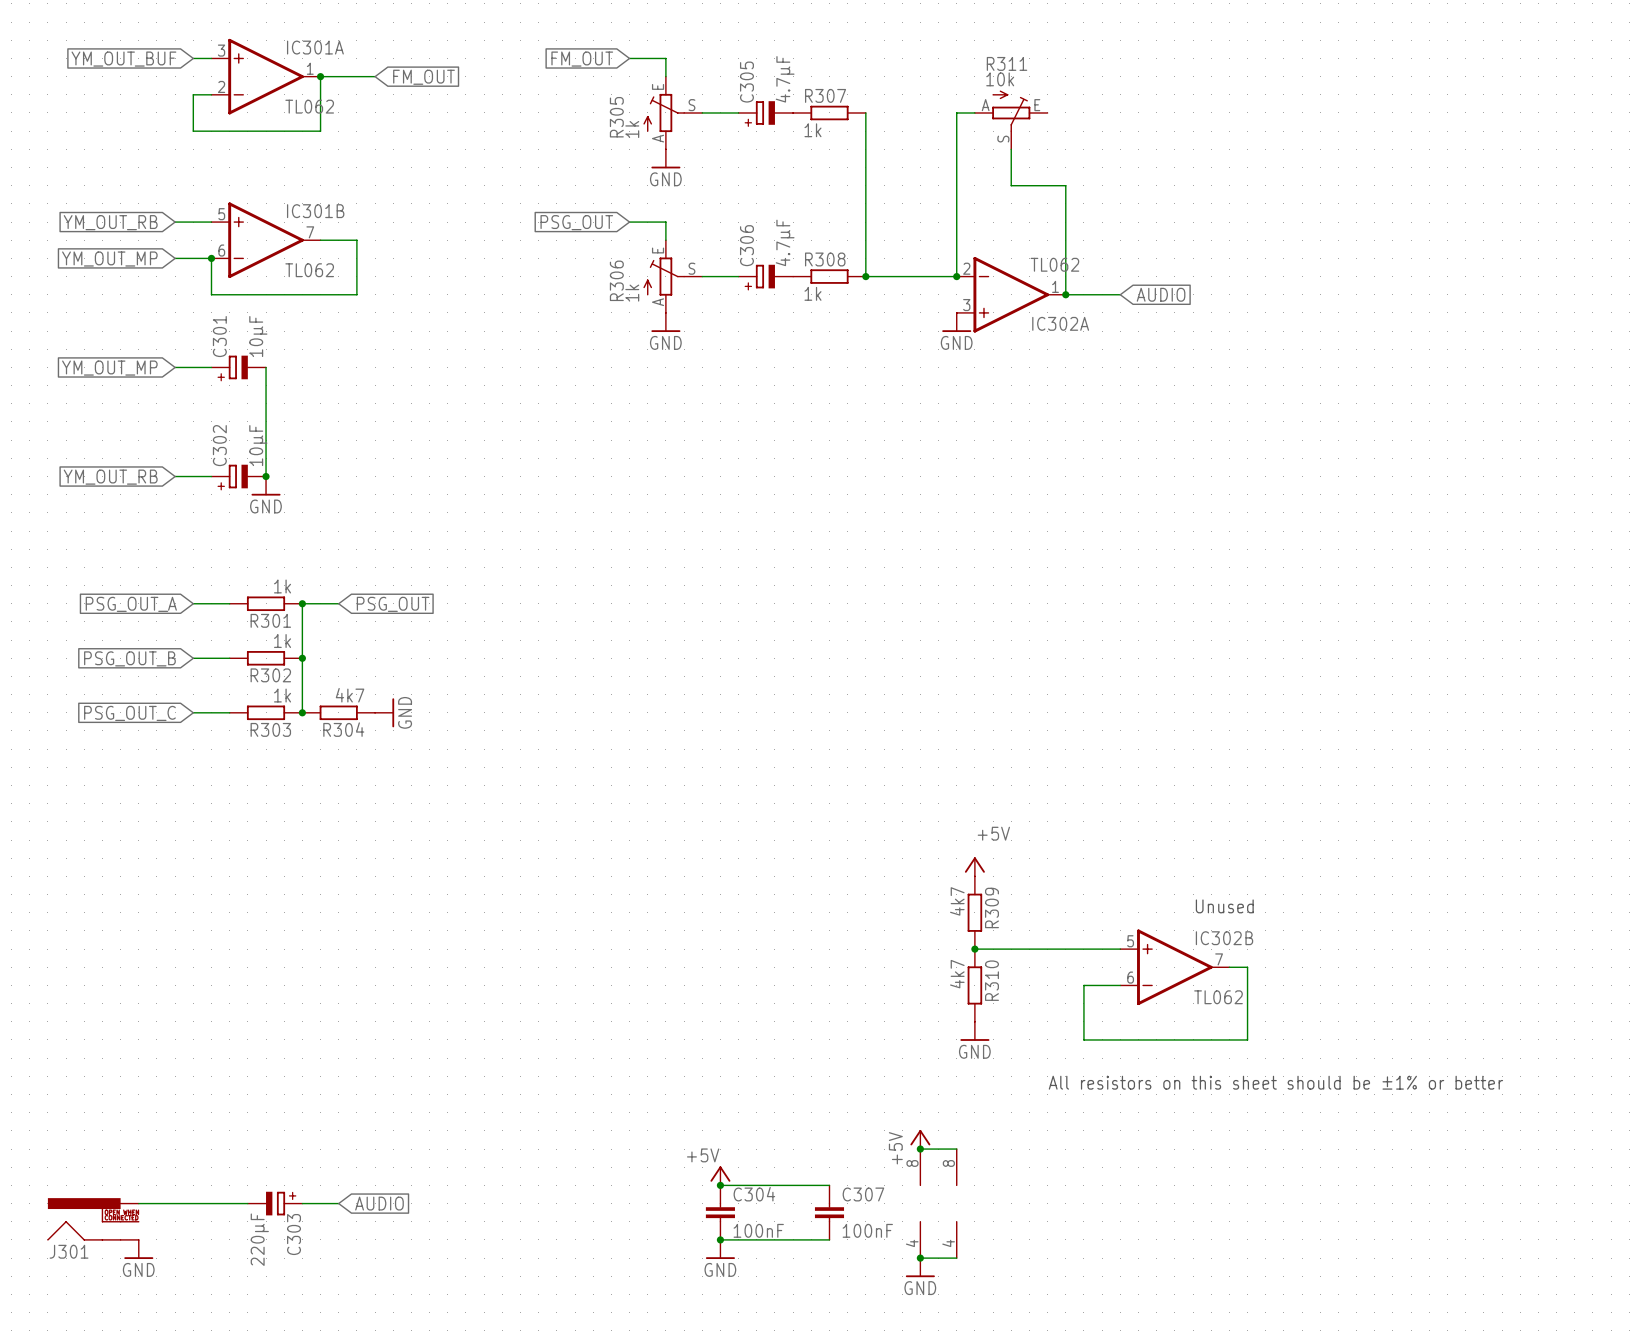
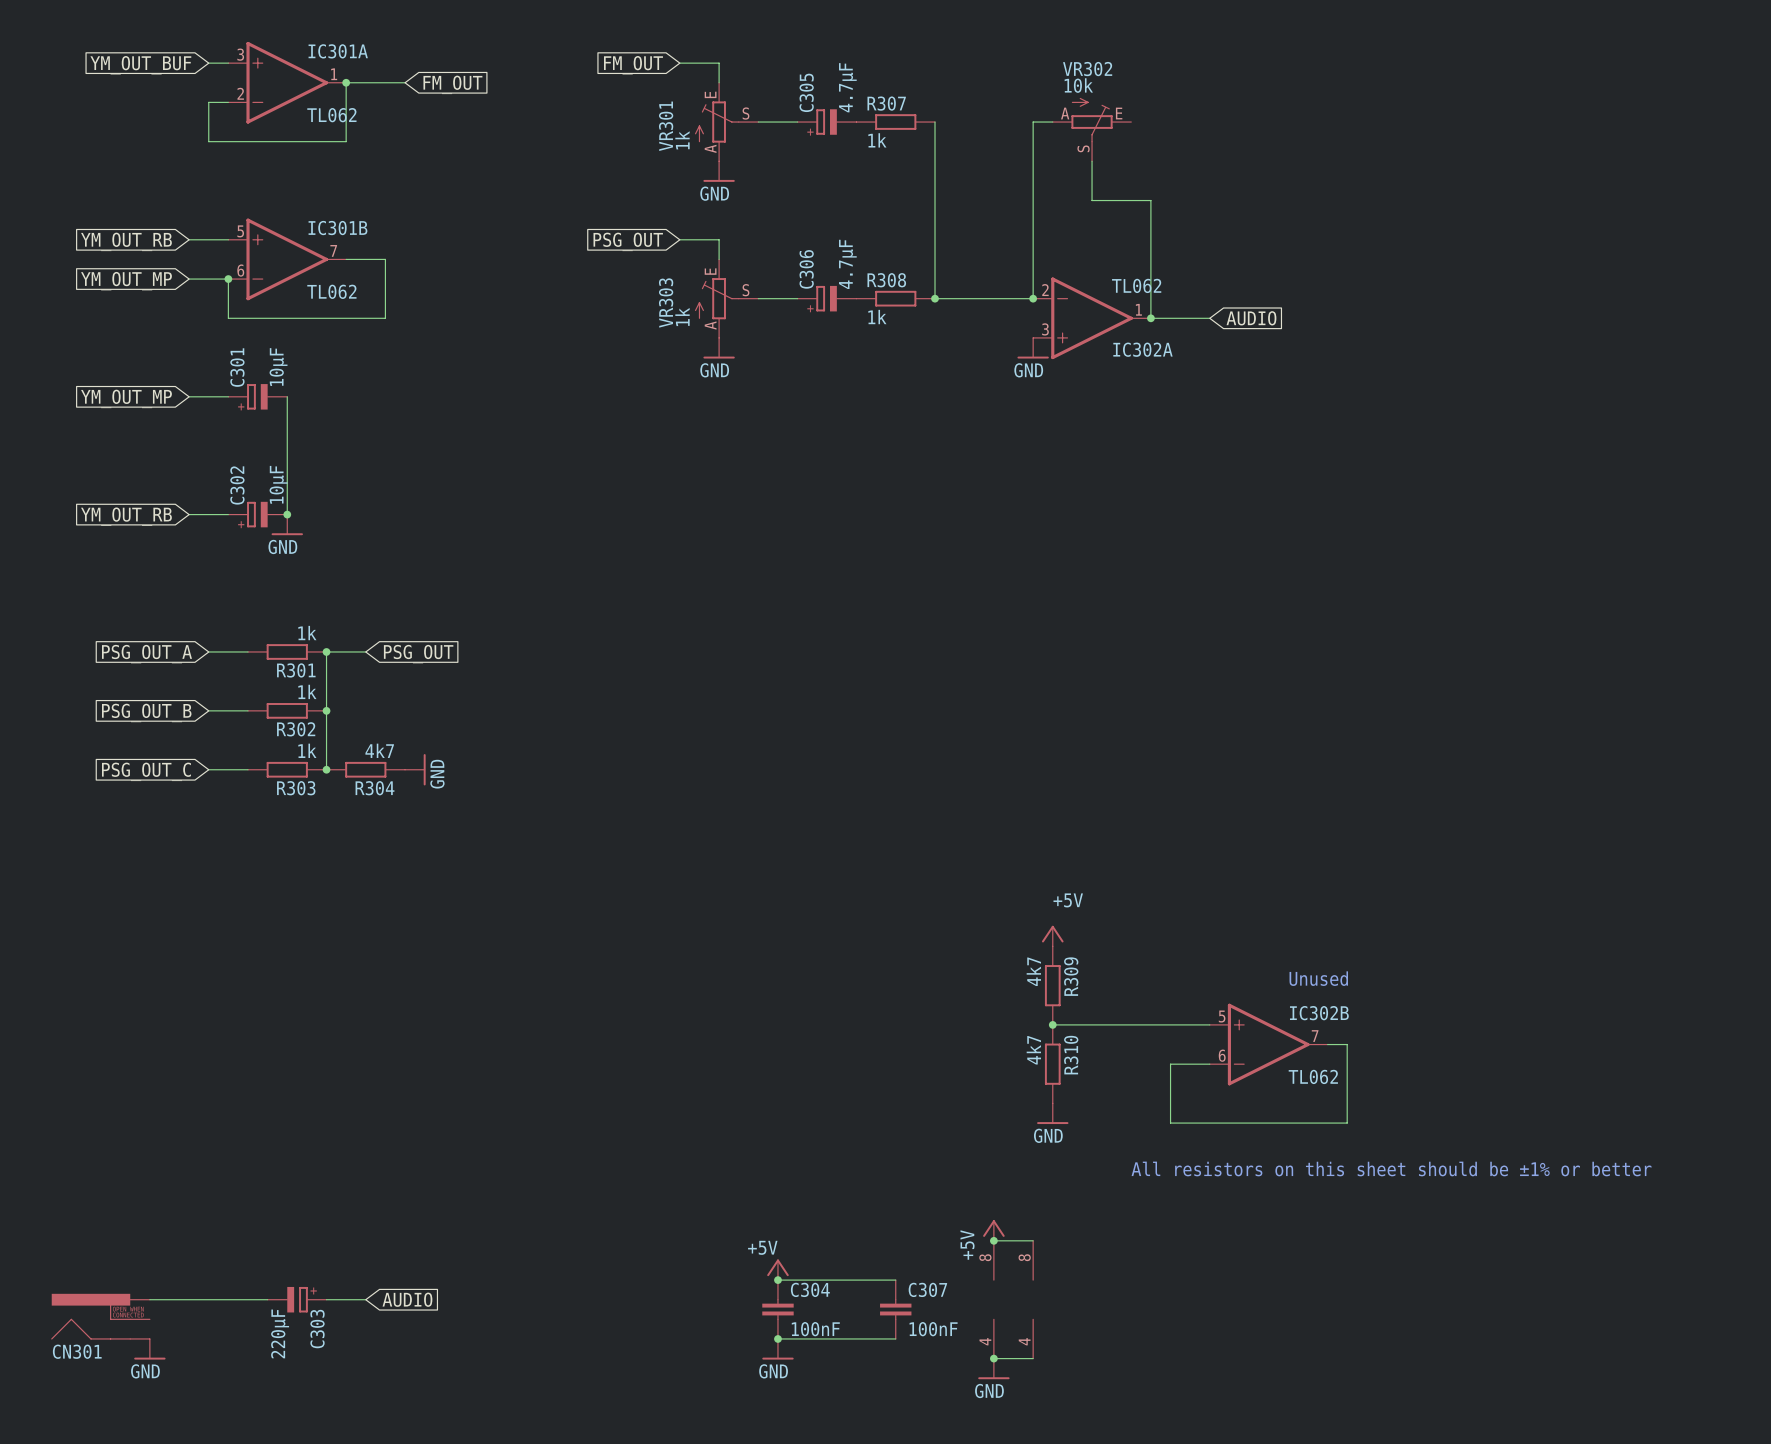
R311 name: R311 (1007, 63) -> VR302 (1087, 69)
R305 name: R305 (616, 117) -> VR301 (666, 126)
R306 name: R306 (616, 280) -> VR303 (666, 302)
J301 name: J301 (69, 1251) -> CN301 (77, 1351)

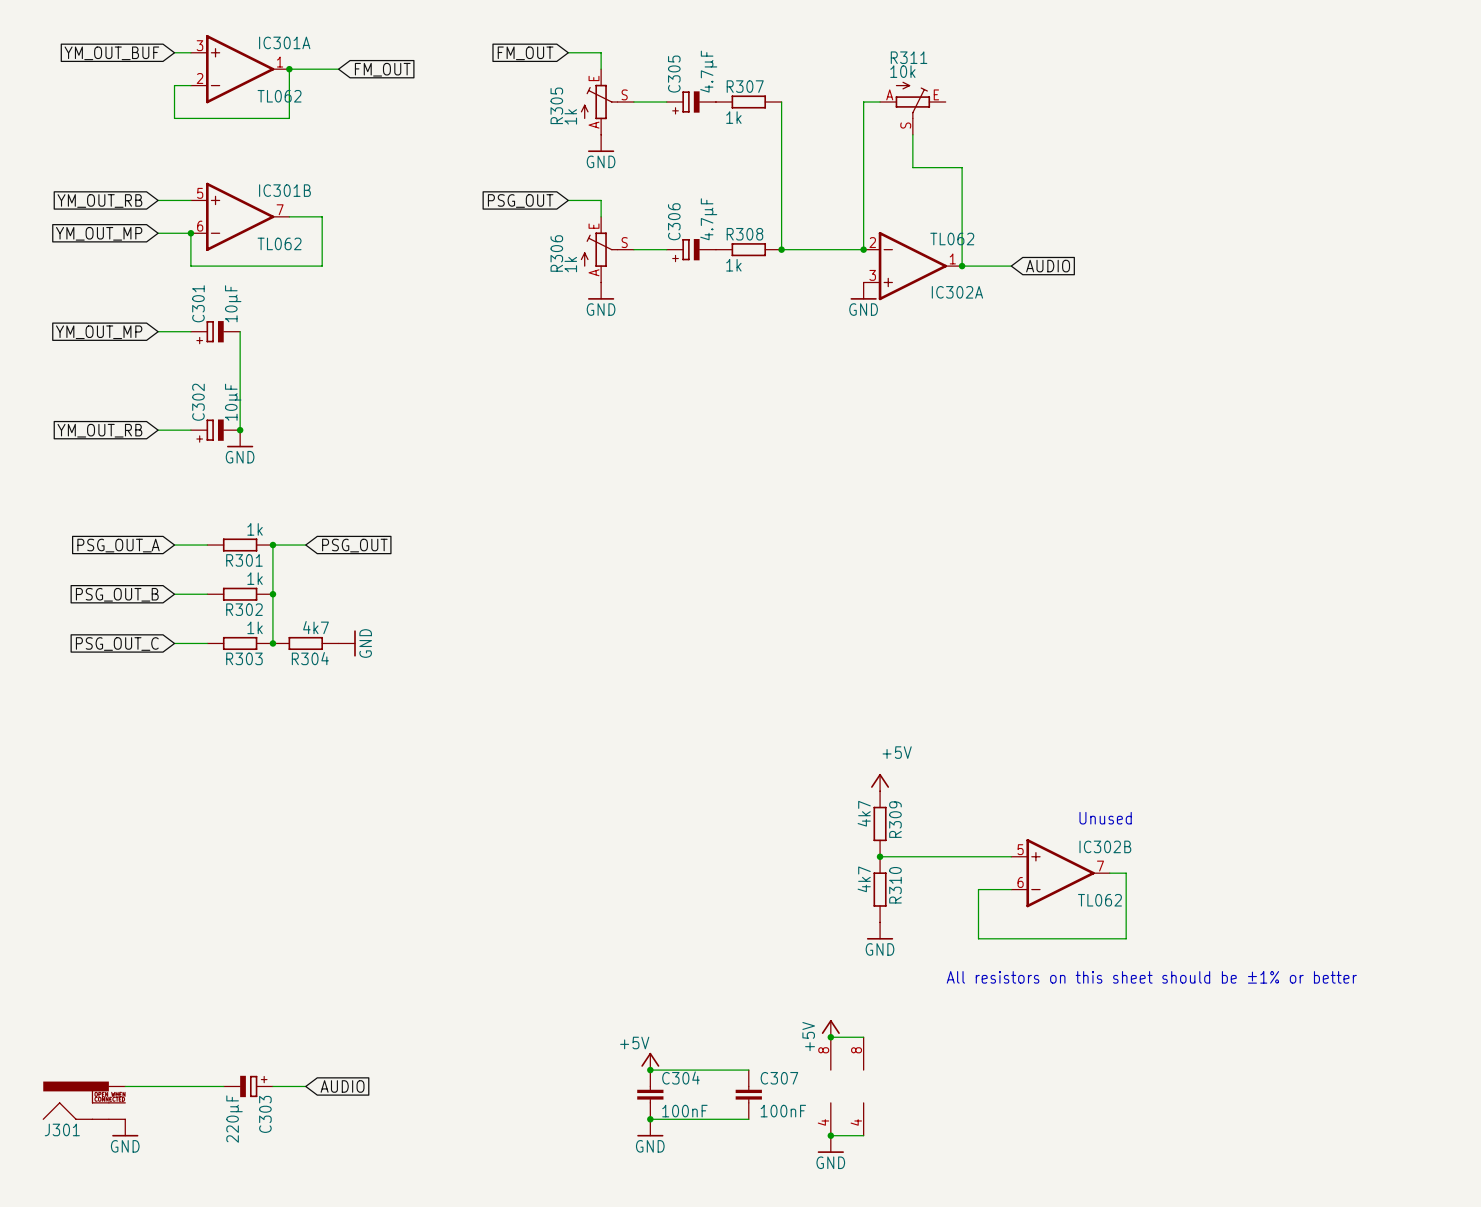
VR302 name: VR302 (1087, 69) -> R311 (909, 57)
VR301 name: VR301 (666, 126) -> R305 (556, 105)
VR303 name: VR303 (666, 302) -> R306 (556, 253)
CN301 name: CN301 (77, 1351) -> J301 (62, 1129)

